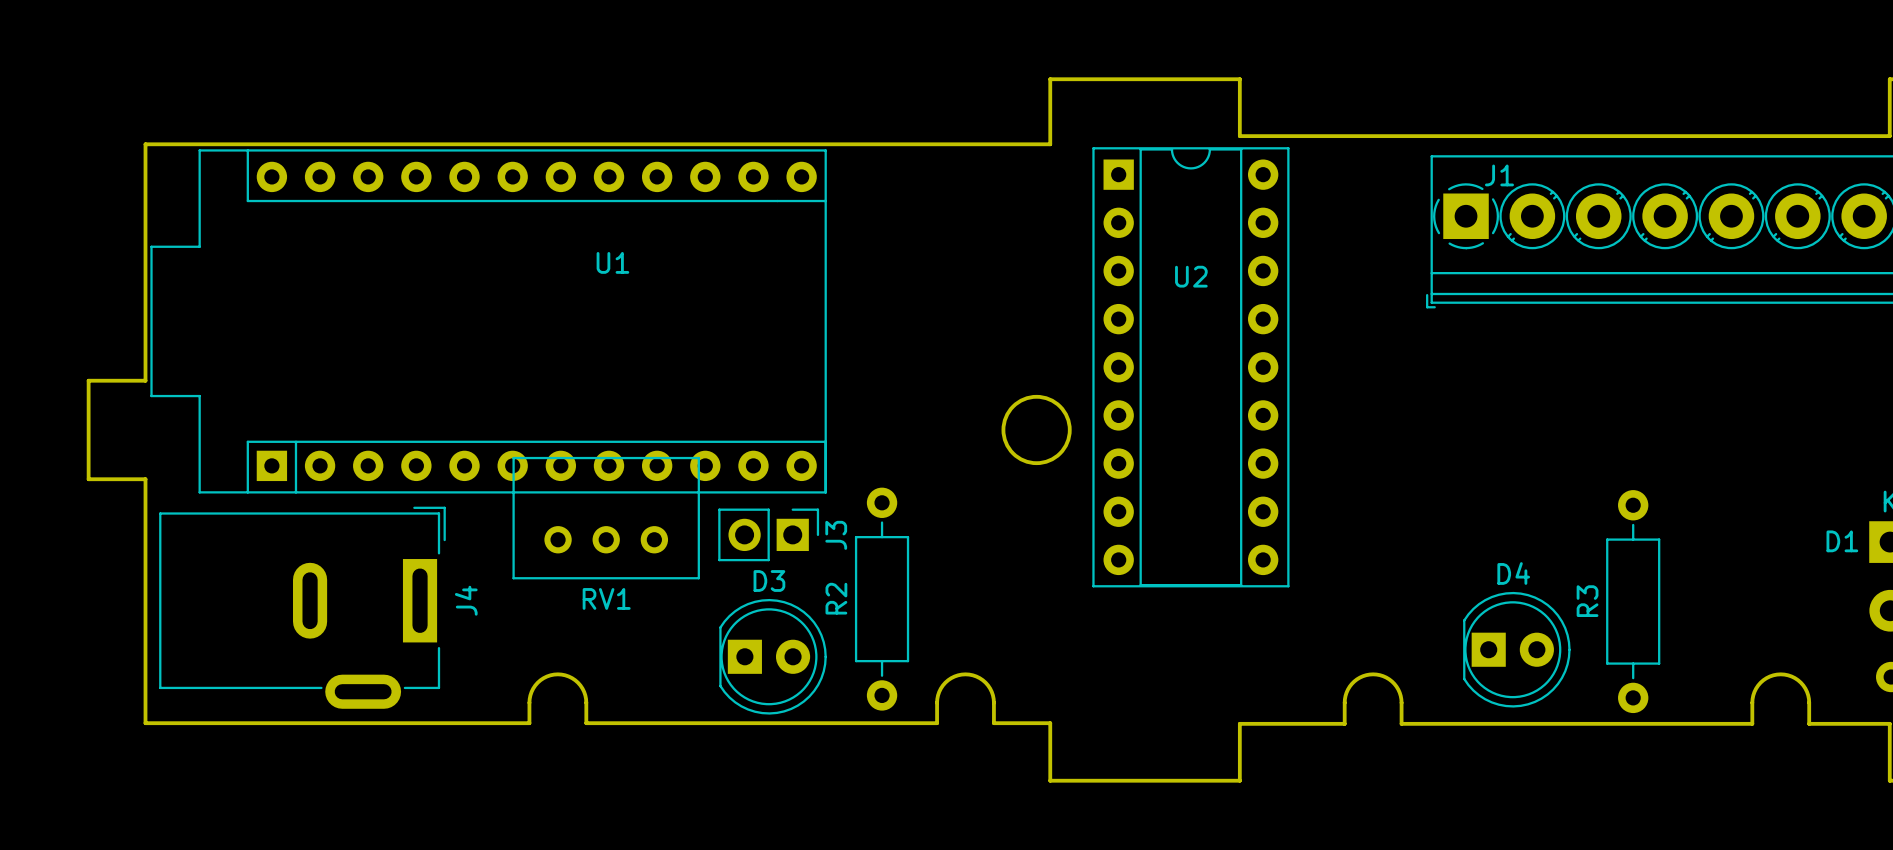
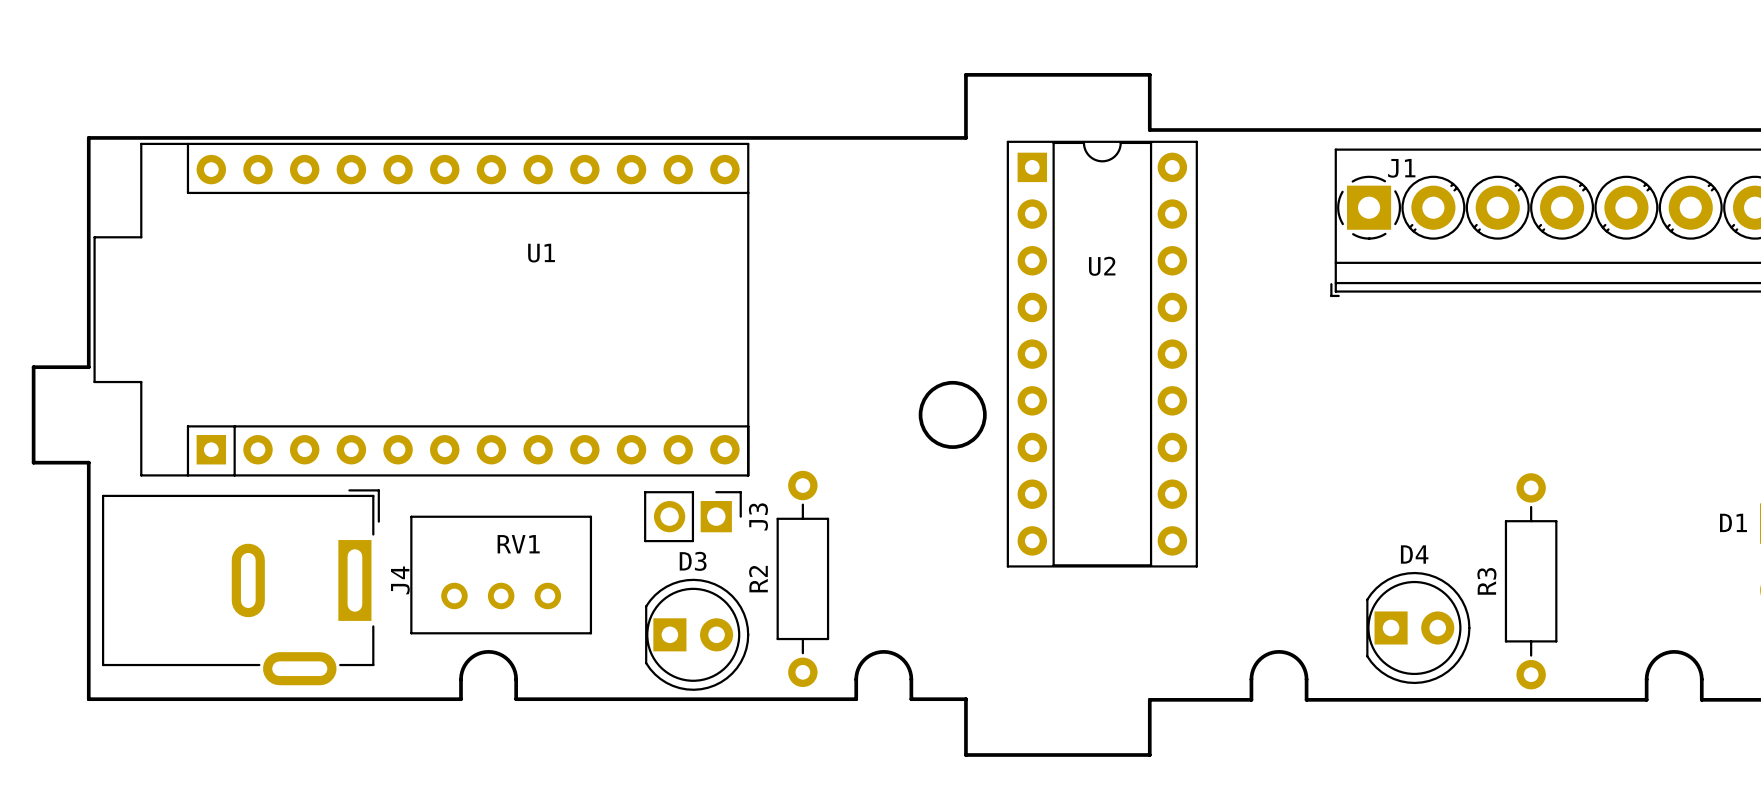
RV1 position: (606, 518) -> (501, 575)
RV1 name position: RV1 (606, 598) -> RV1 (518, 544)

